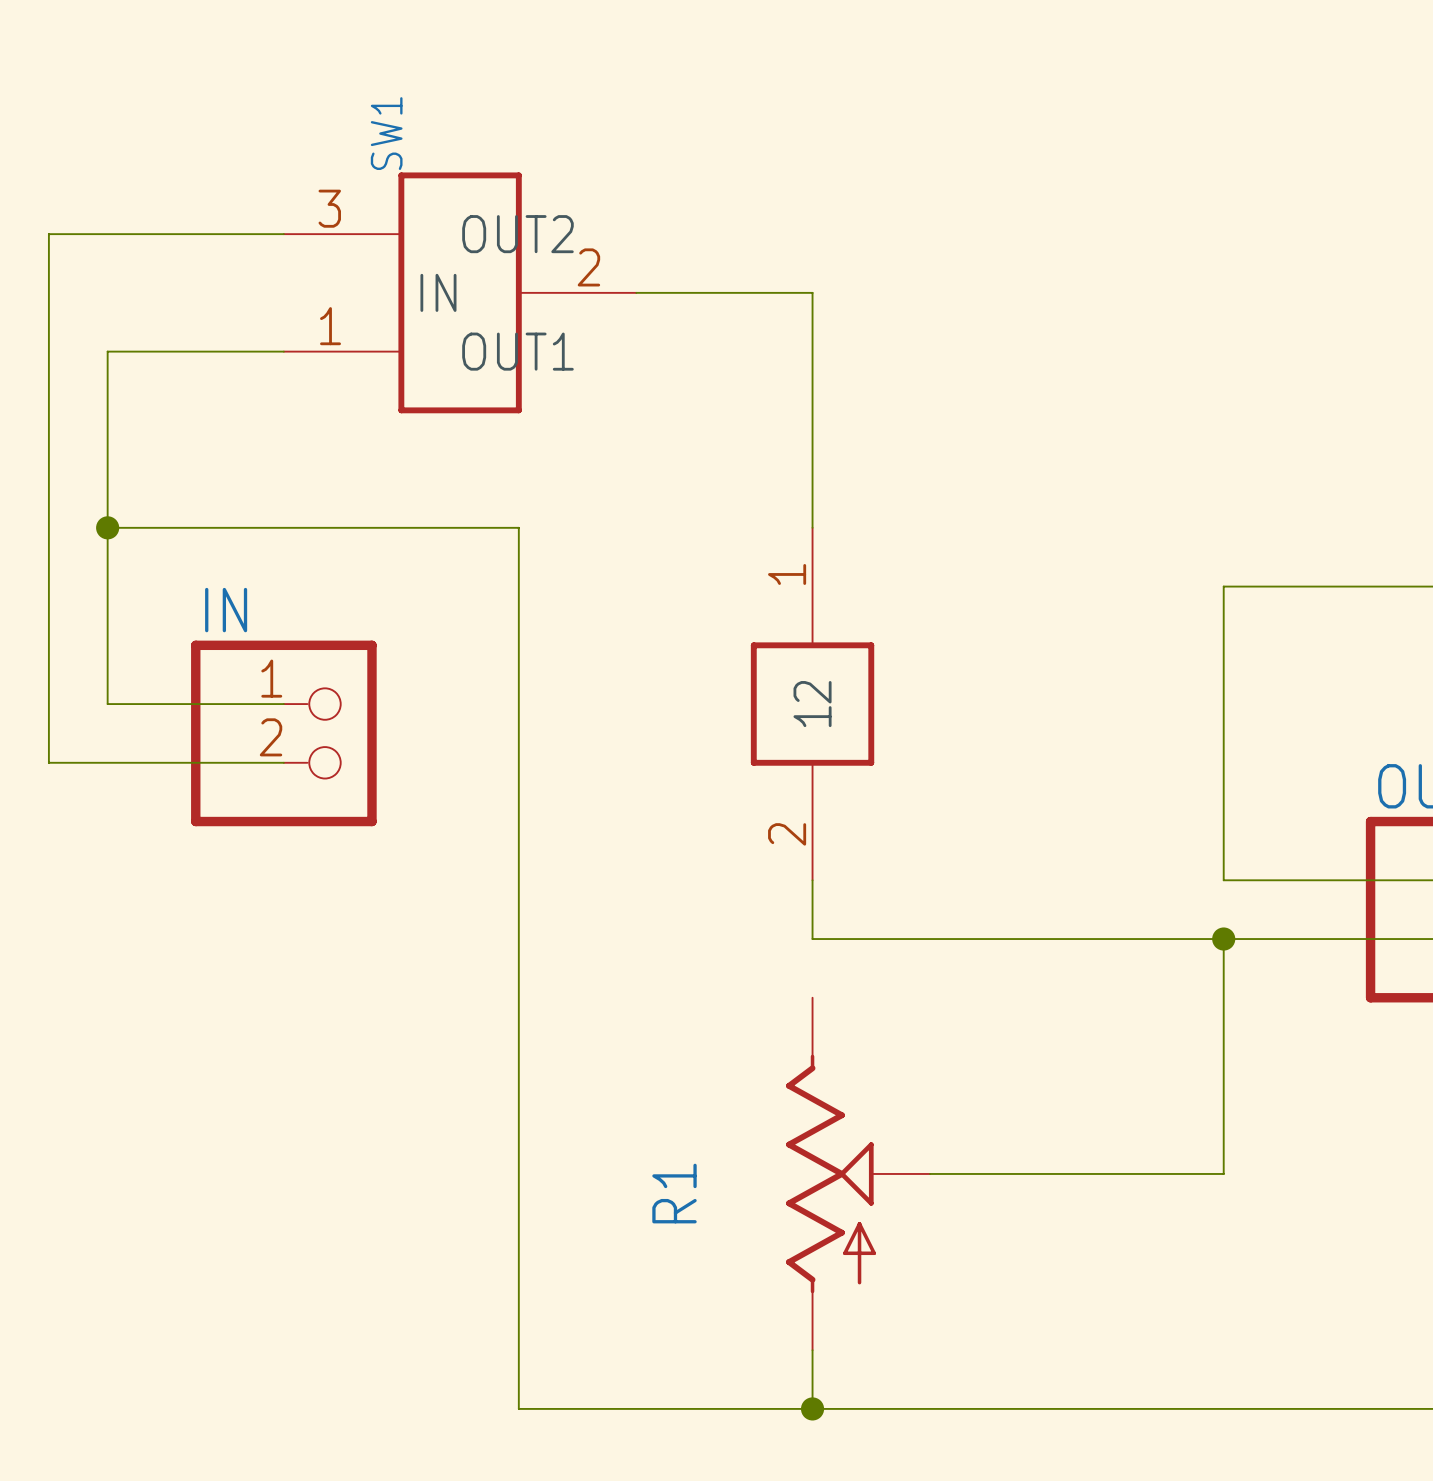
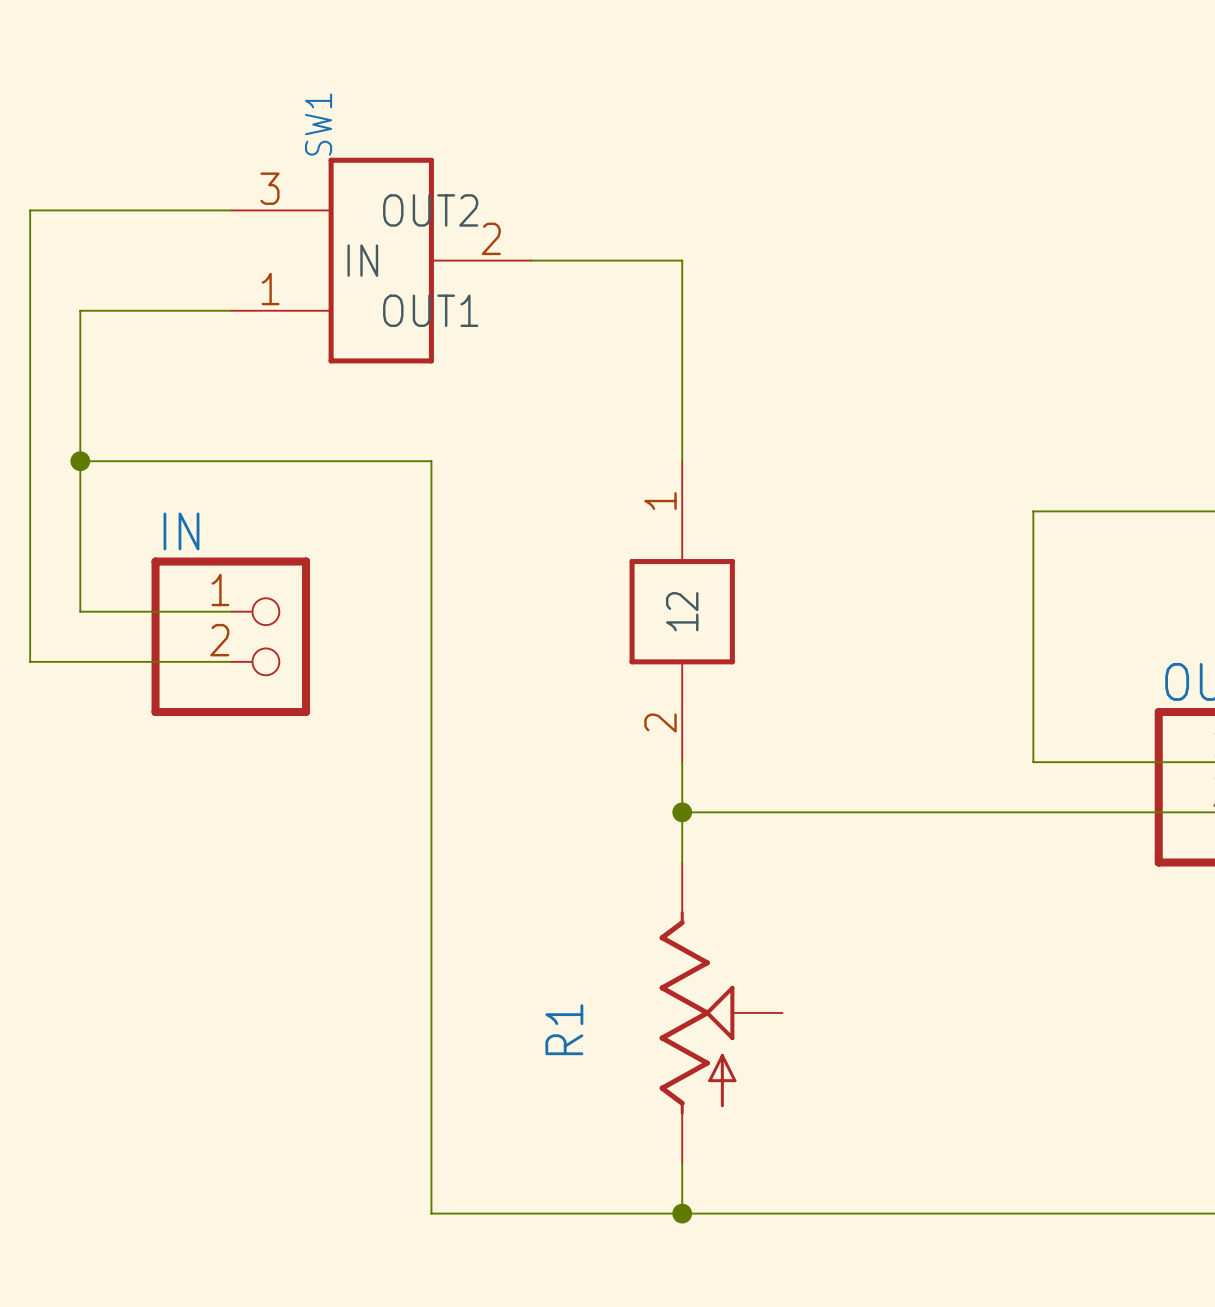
wire: none -> (682, 812) (682, 862)
junction: none -> (682, 812)
wire: (1223, 939) (1223, 1173) (930, 1173) -> none
junction: (1223, 939) -> none

